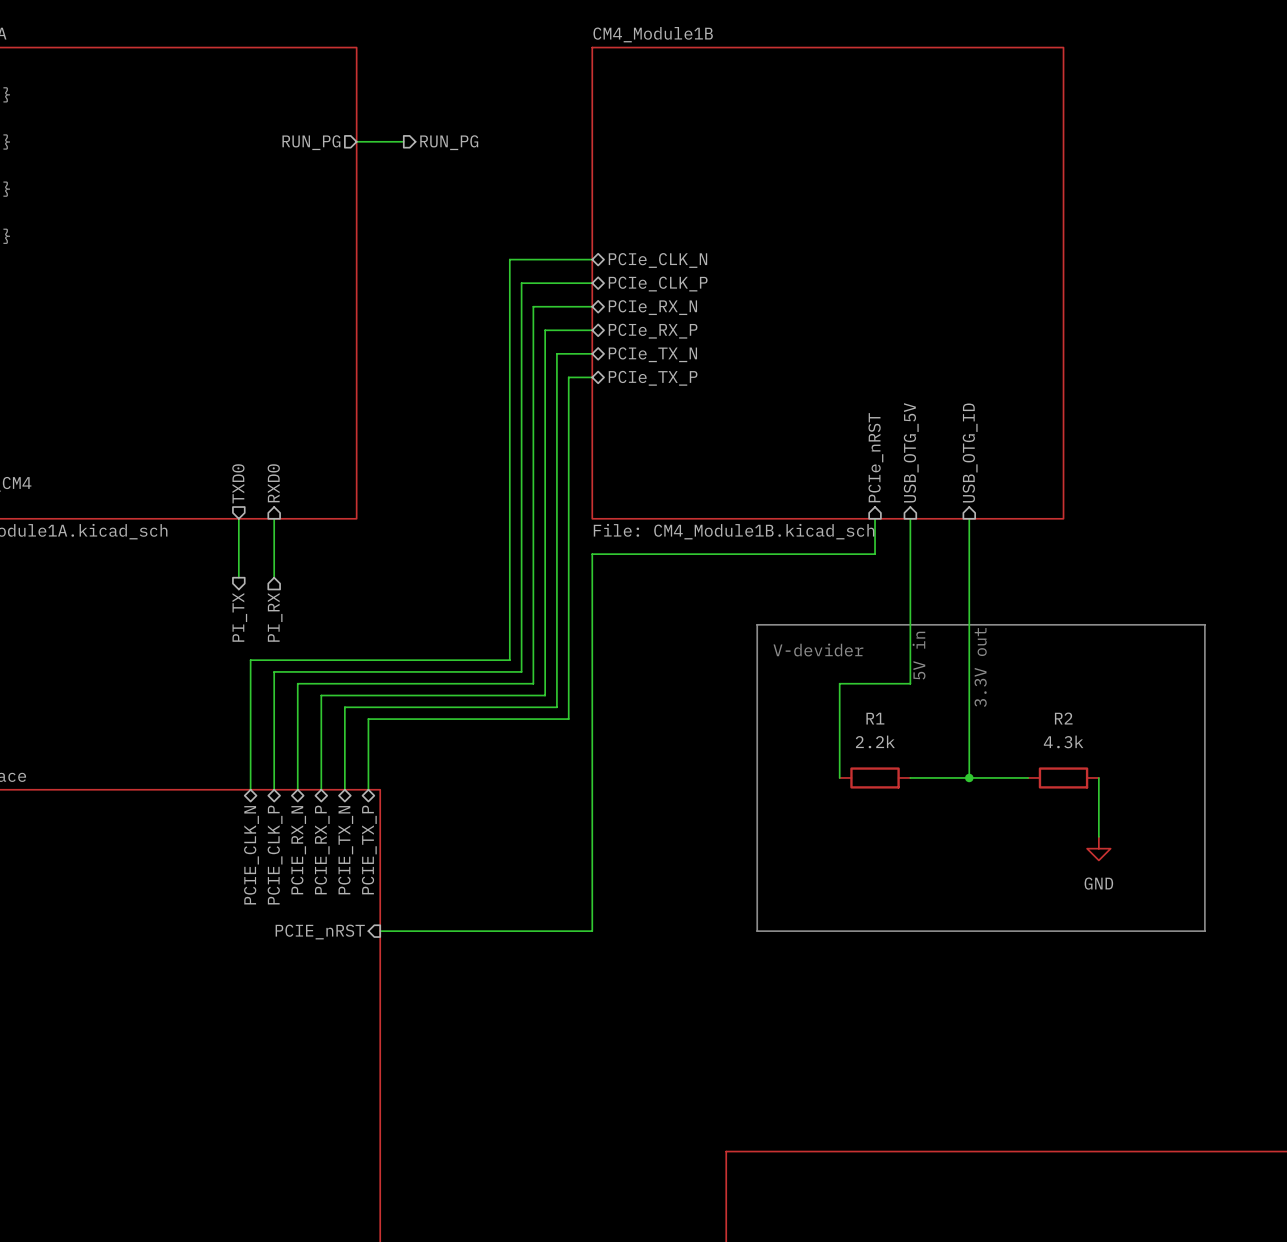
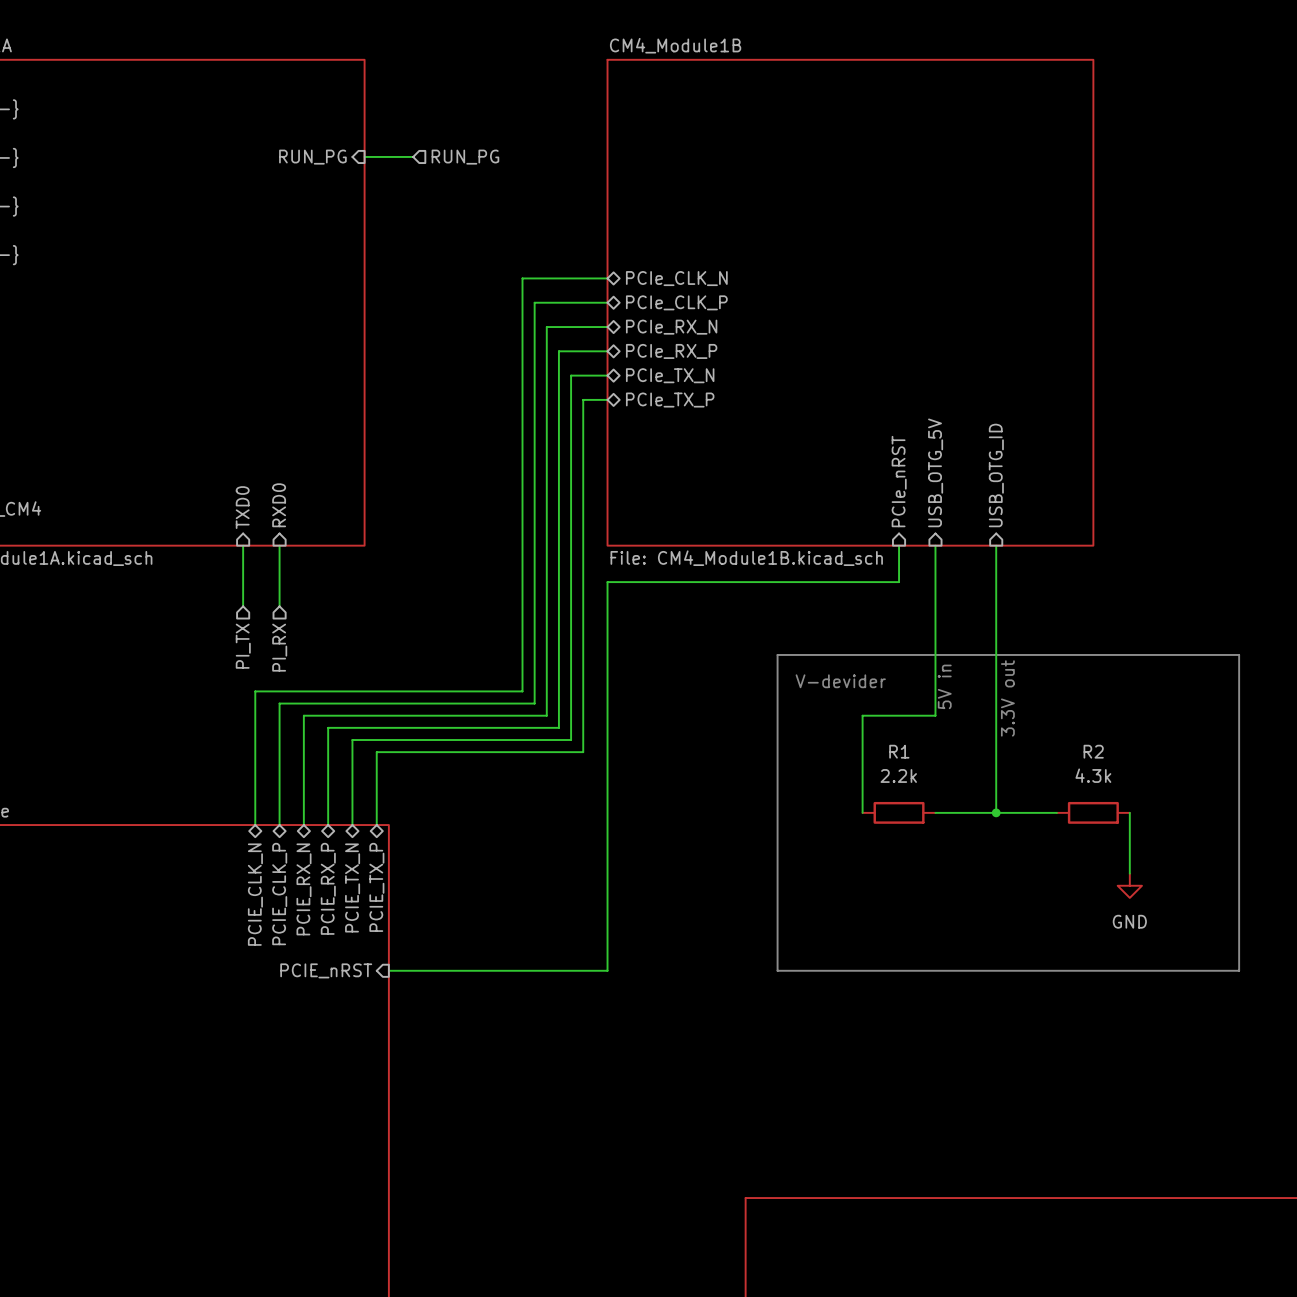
sheet pin shape: output (311, 142) -> input (312, 157)
hierarchical label shape: output (449, 142) -> input (465, 157)
sheet pin shape: output (238, 483) -> input (242, 507)
hierarchical label shape: output (239, 617) -> input (243, 646)

